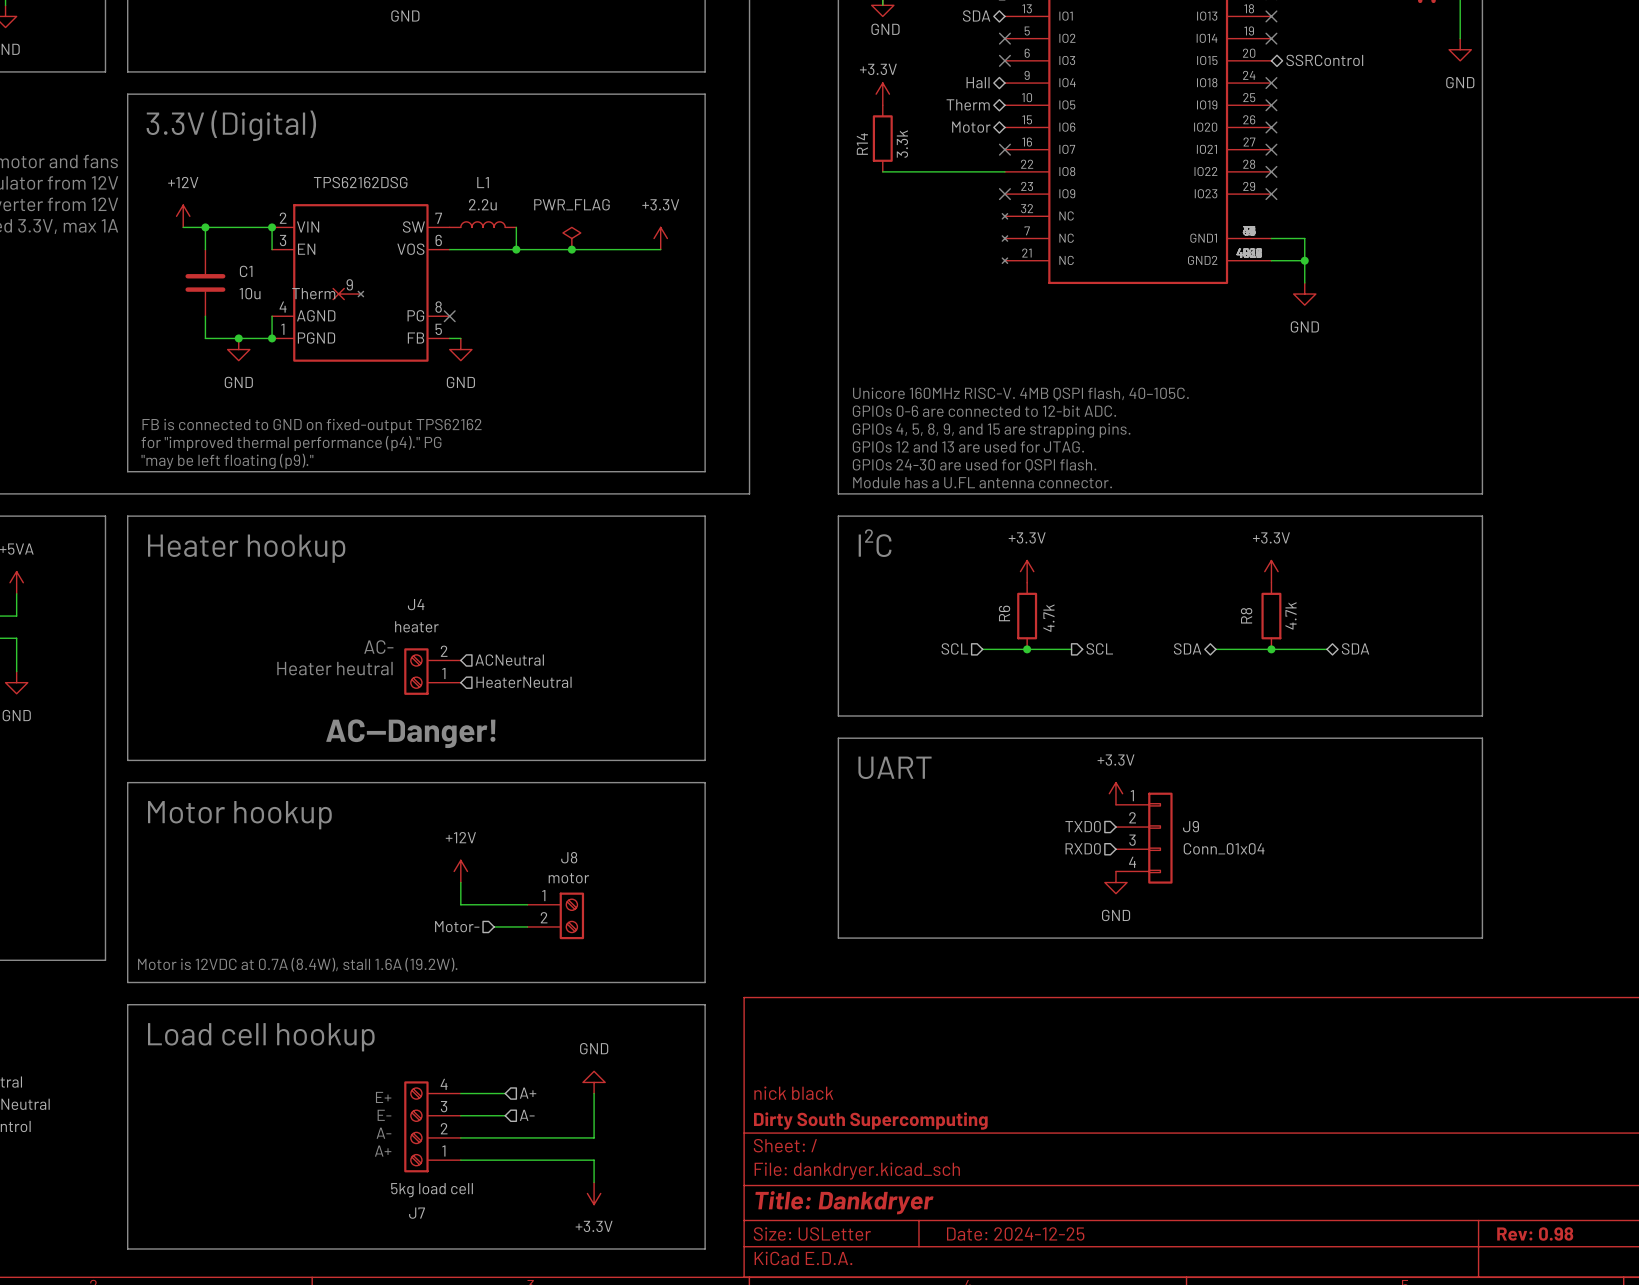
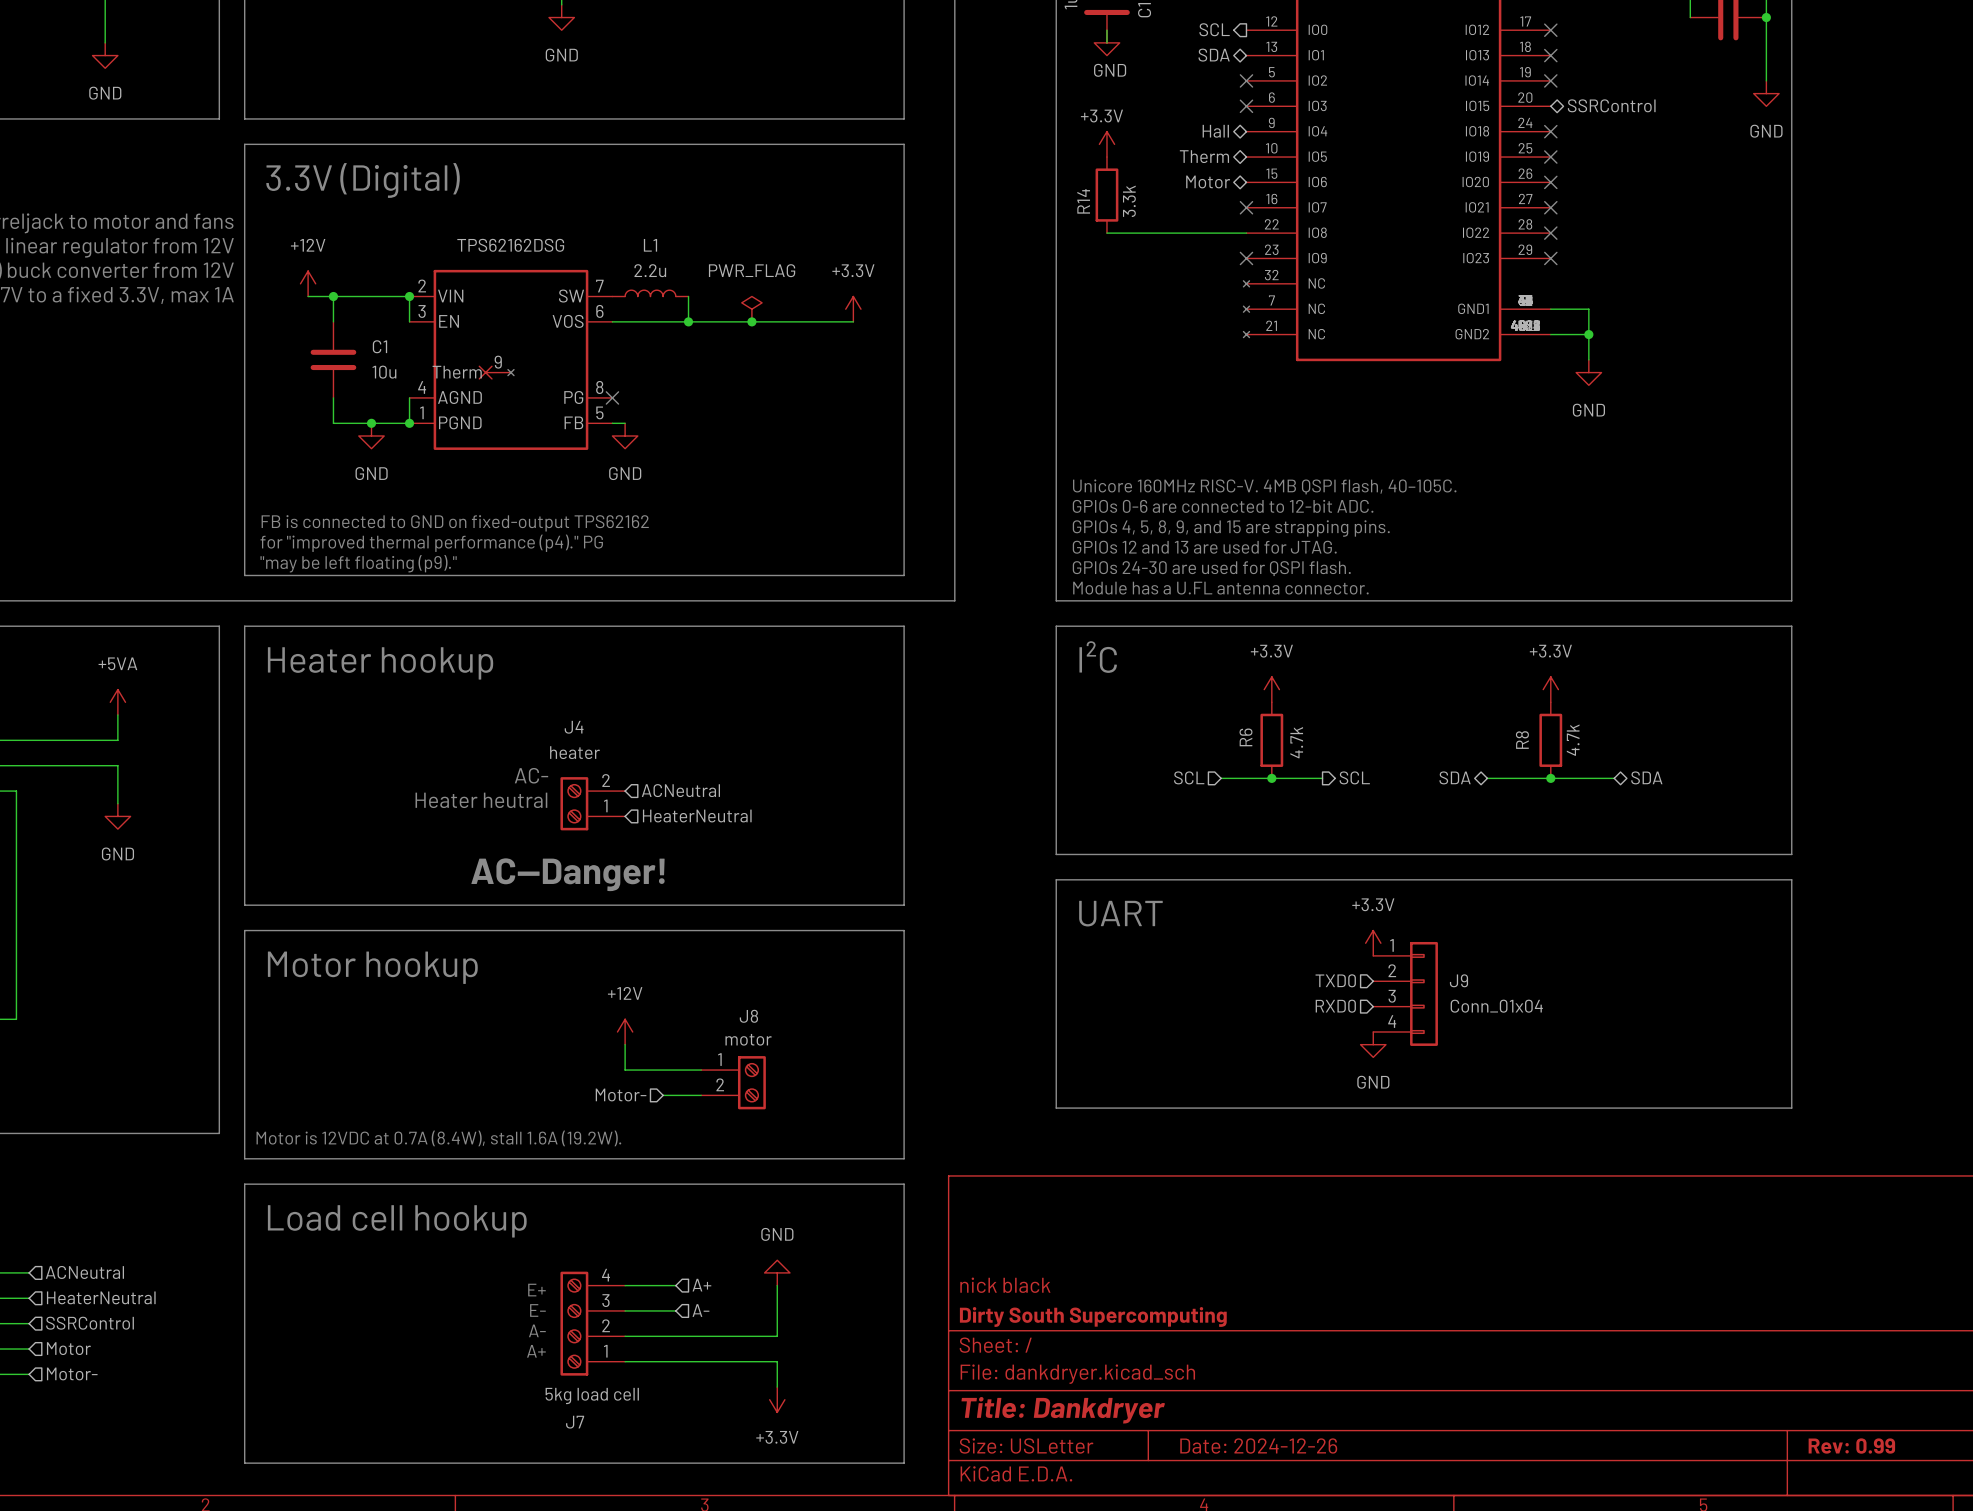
title block: Rev: 0.98 (1535, 1233) -> Rev: 0.99 (1851, 1446)
title block: Date: 2024-12-25 (1015, 1234) -> Date: 2024-12-26 (1258, 1446)

